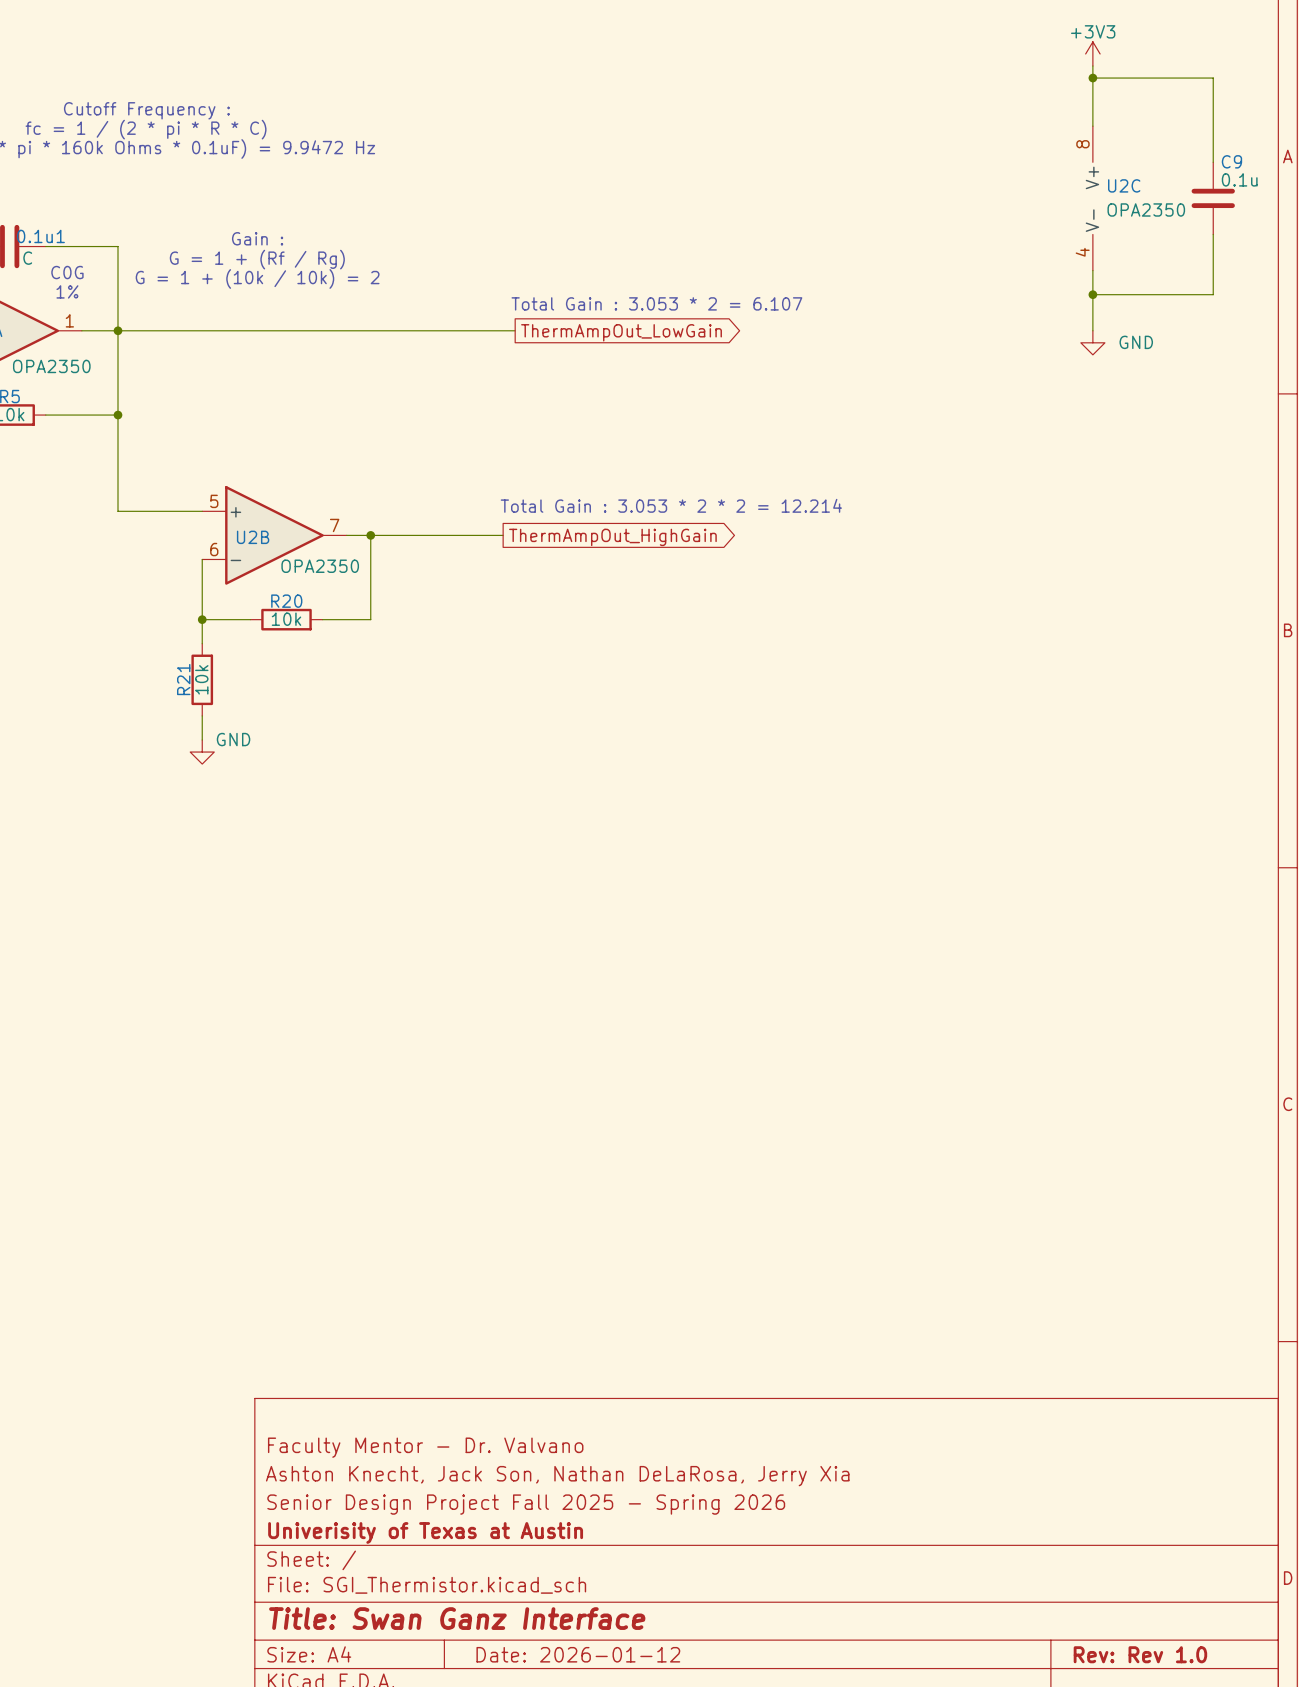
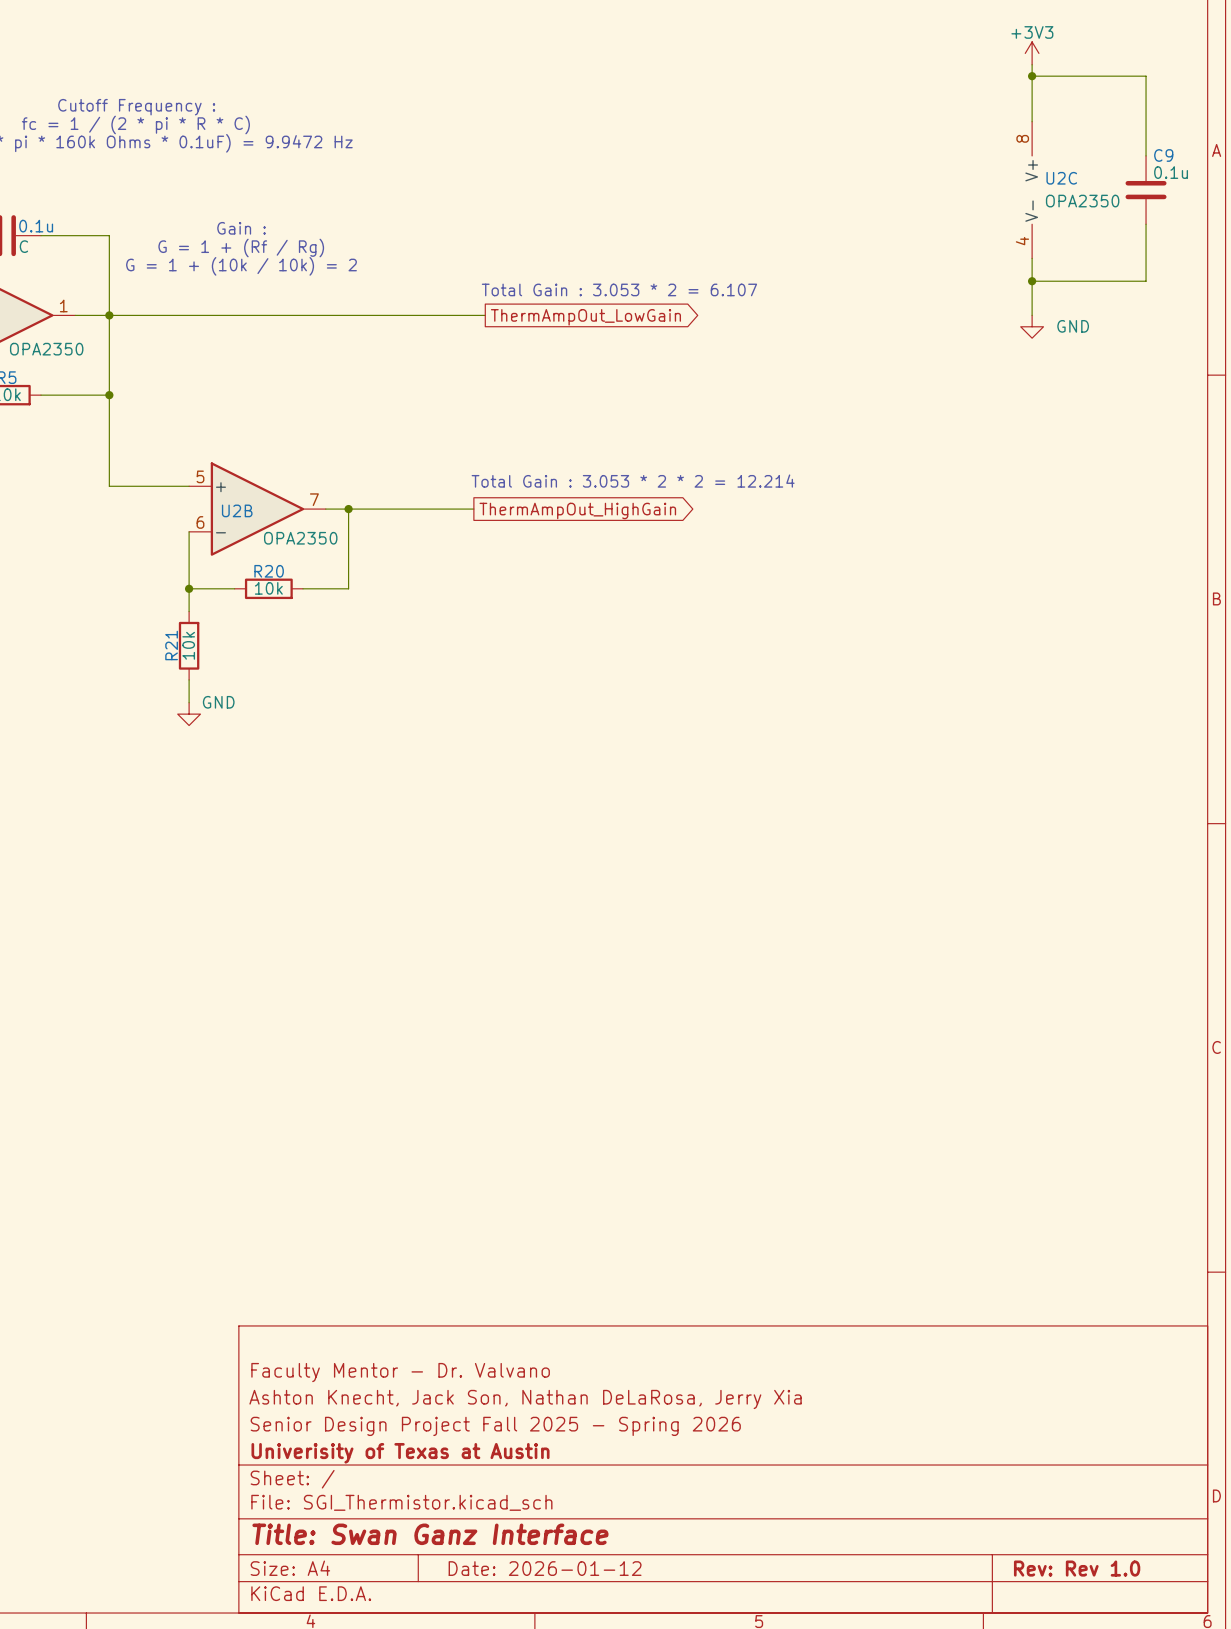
0.1u1 name: 0.1u1 (40, 236) -> 0.1u (36, 226)
text: C0G (67, 272) -> none
text: 1% (67, 291) -> none

